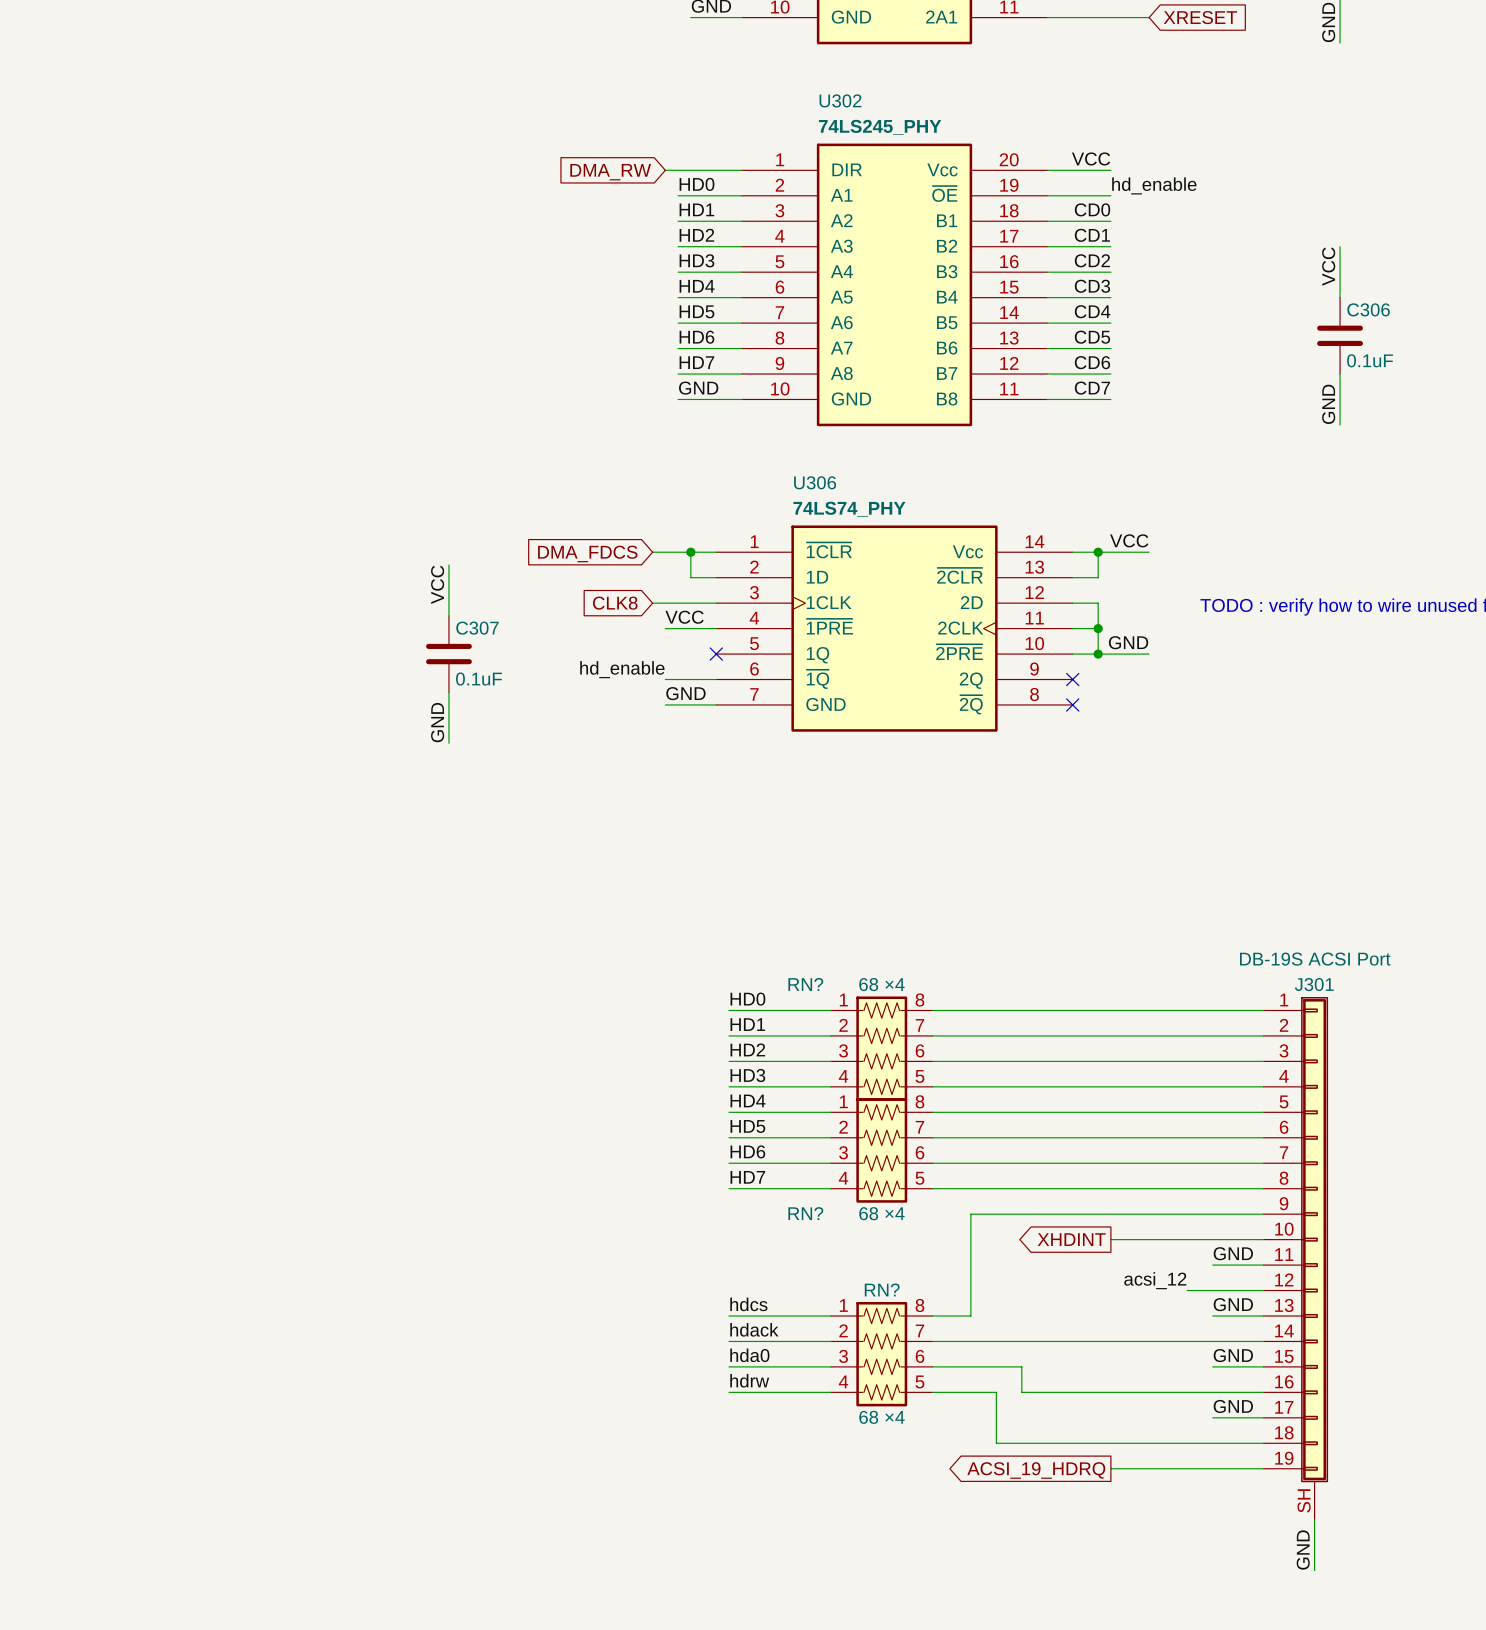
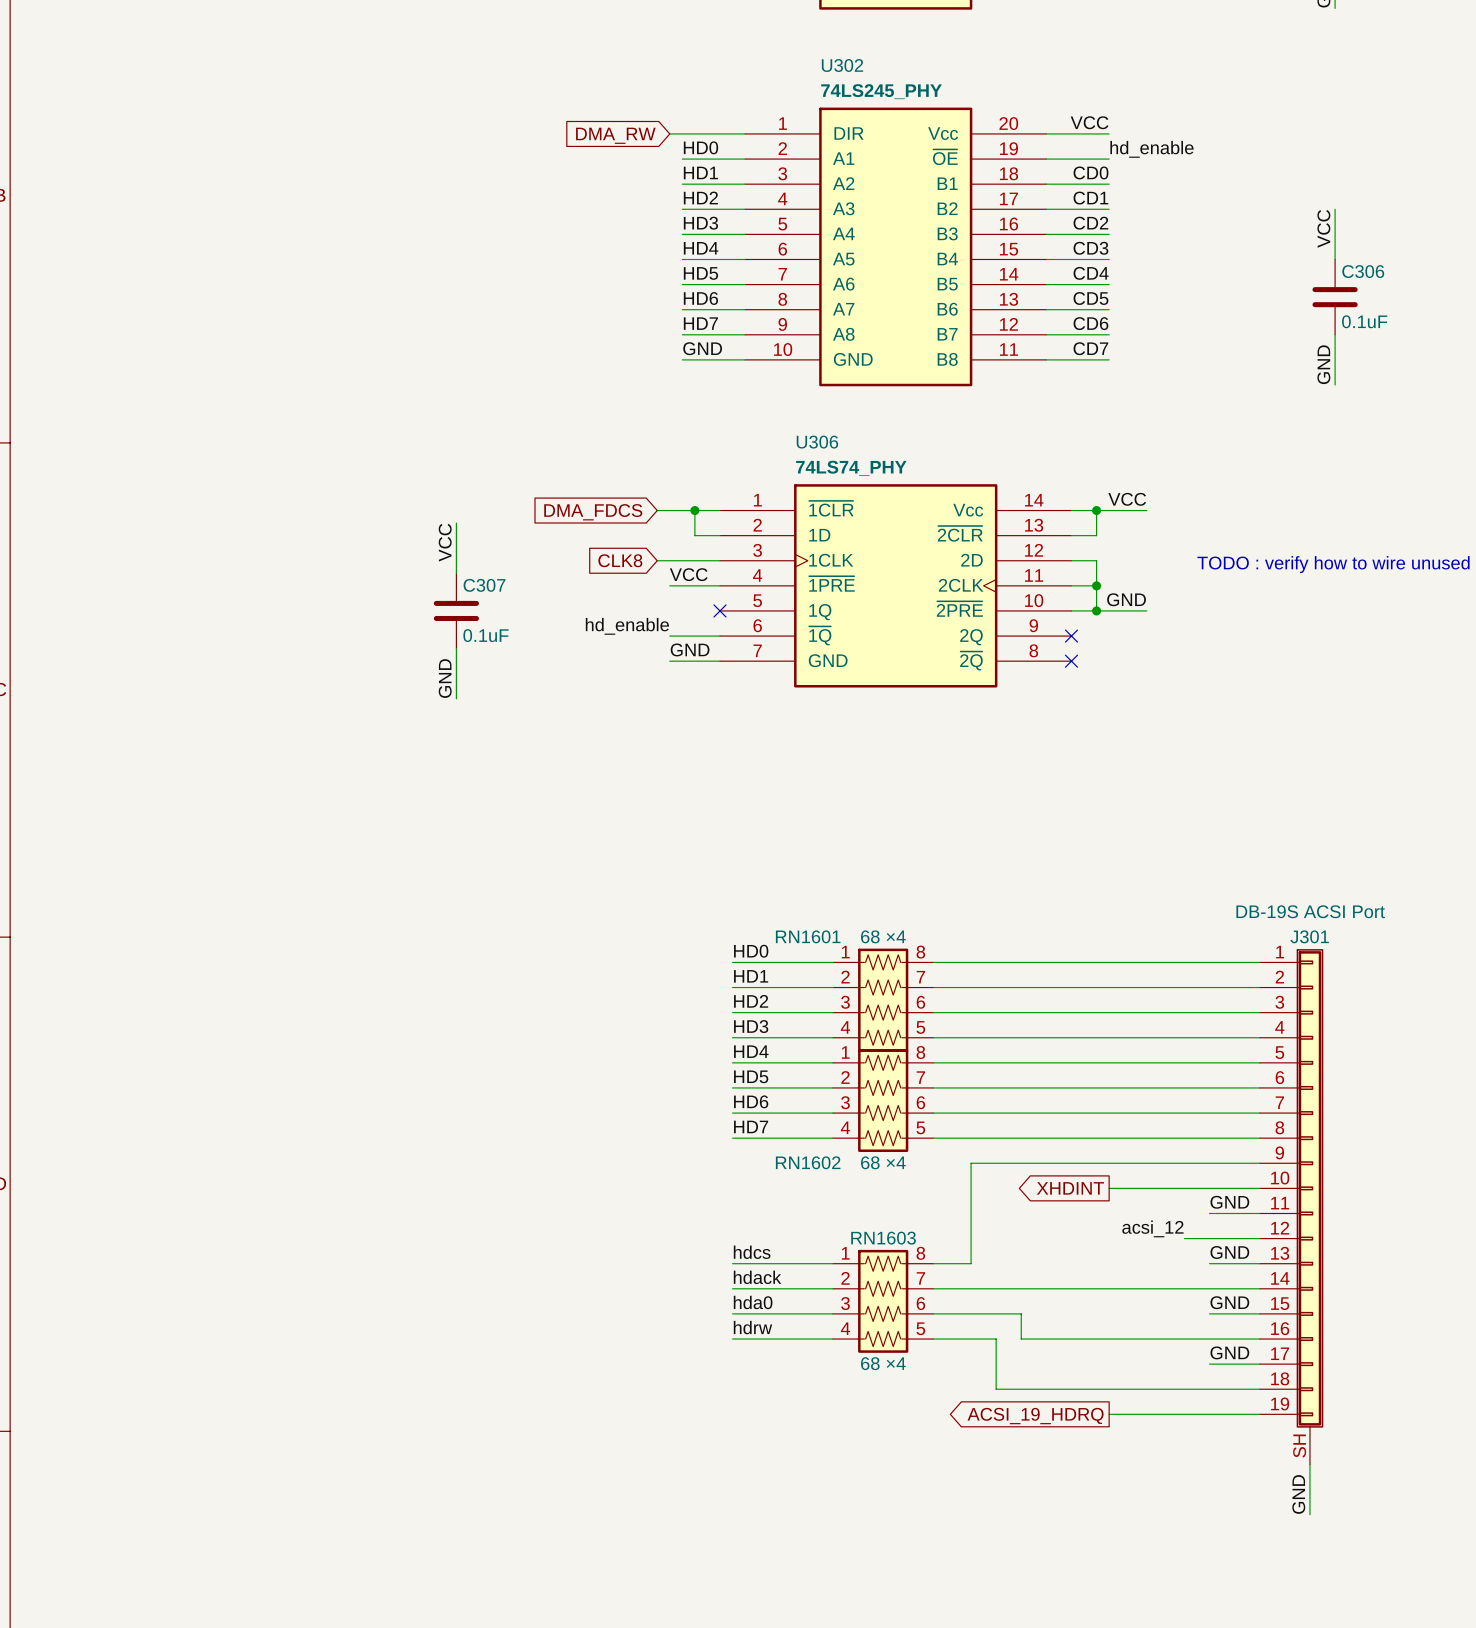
RN? name: RN? (805, 984) -> RN1601 (808, 936)
RN? name: RN? (805, 1213) -> RN1602 (808, 1162)
RN? name: RN? (882, 1289) -> RN1603 (883, 1238)

